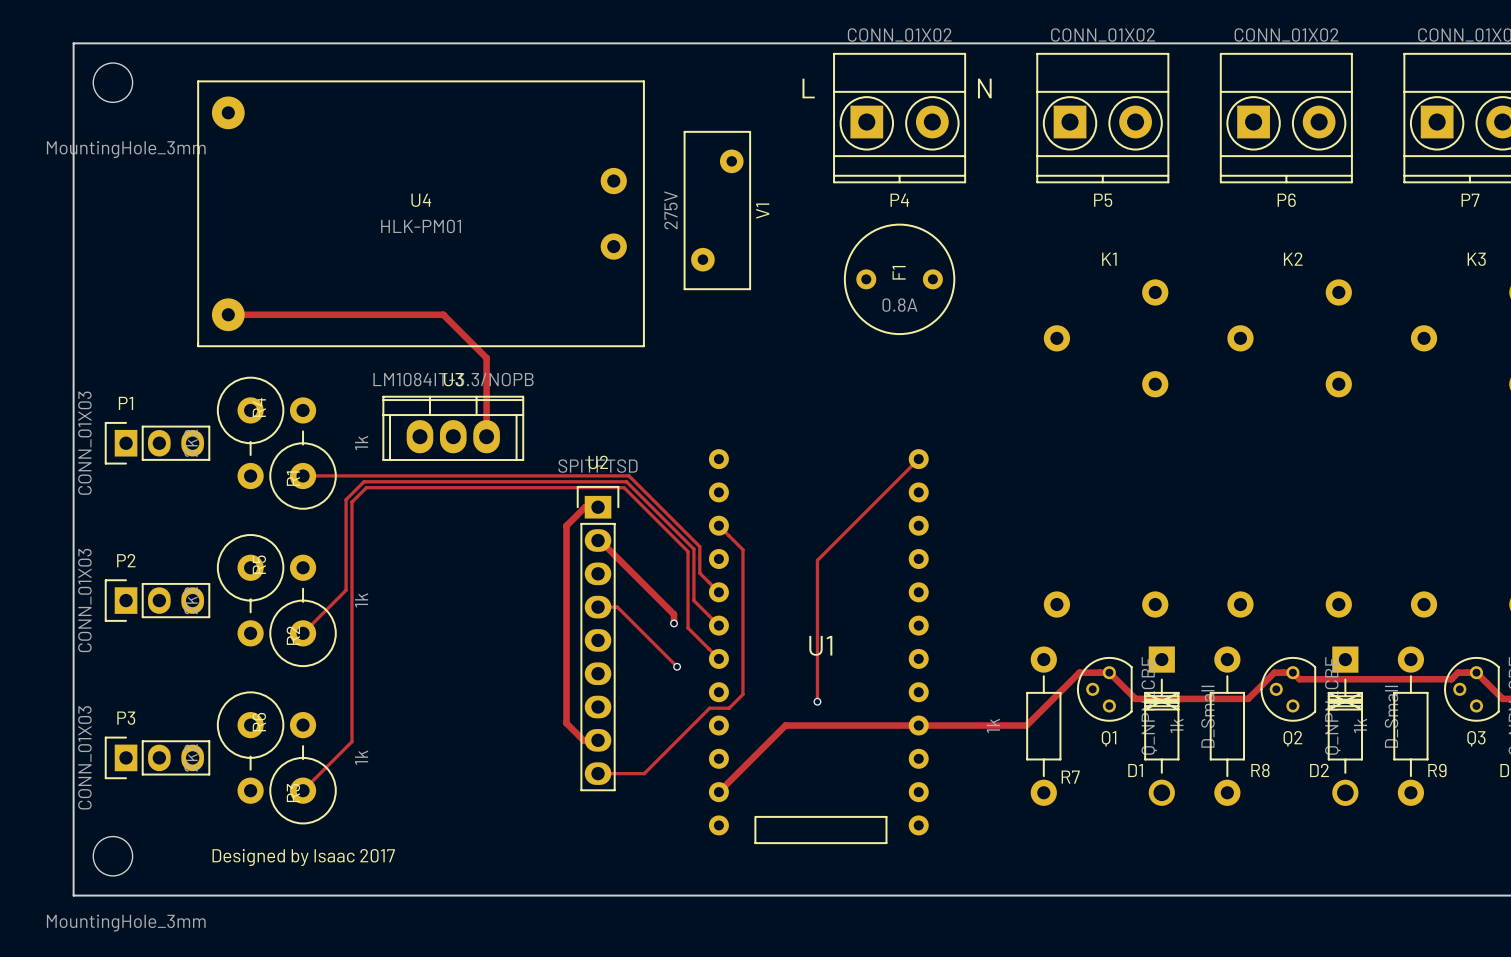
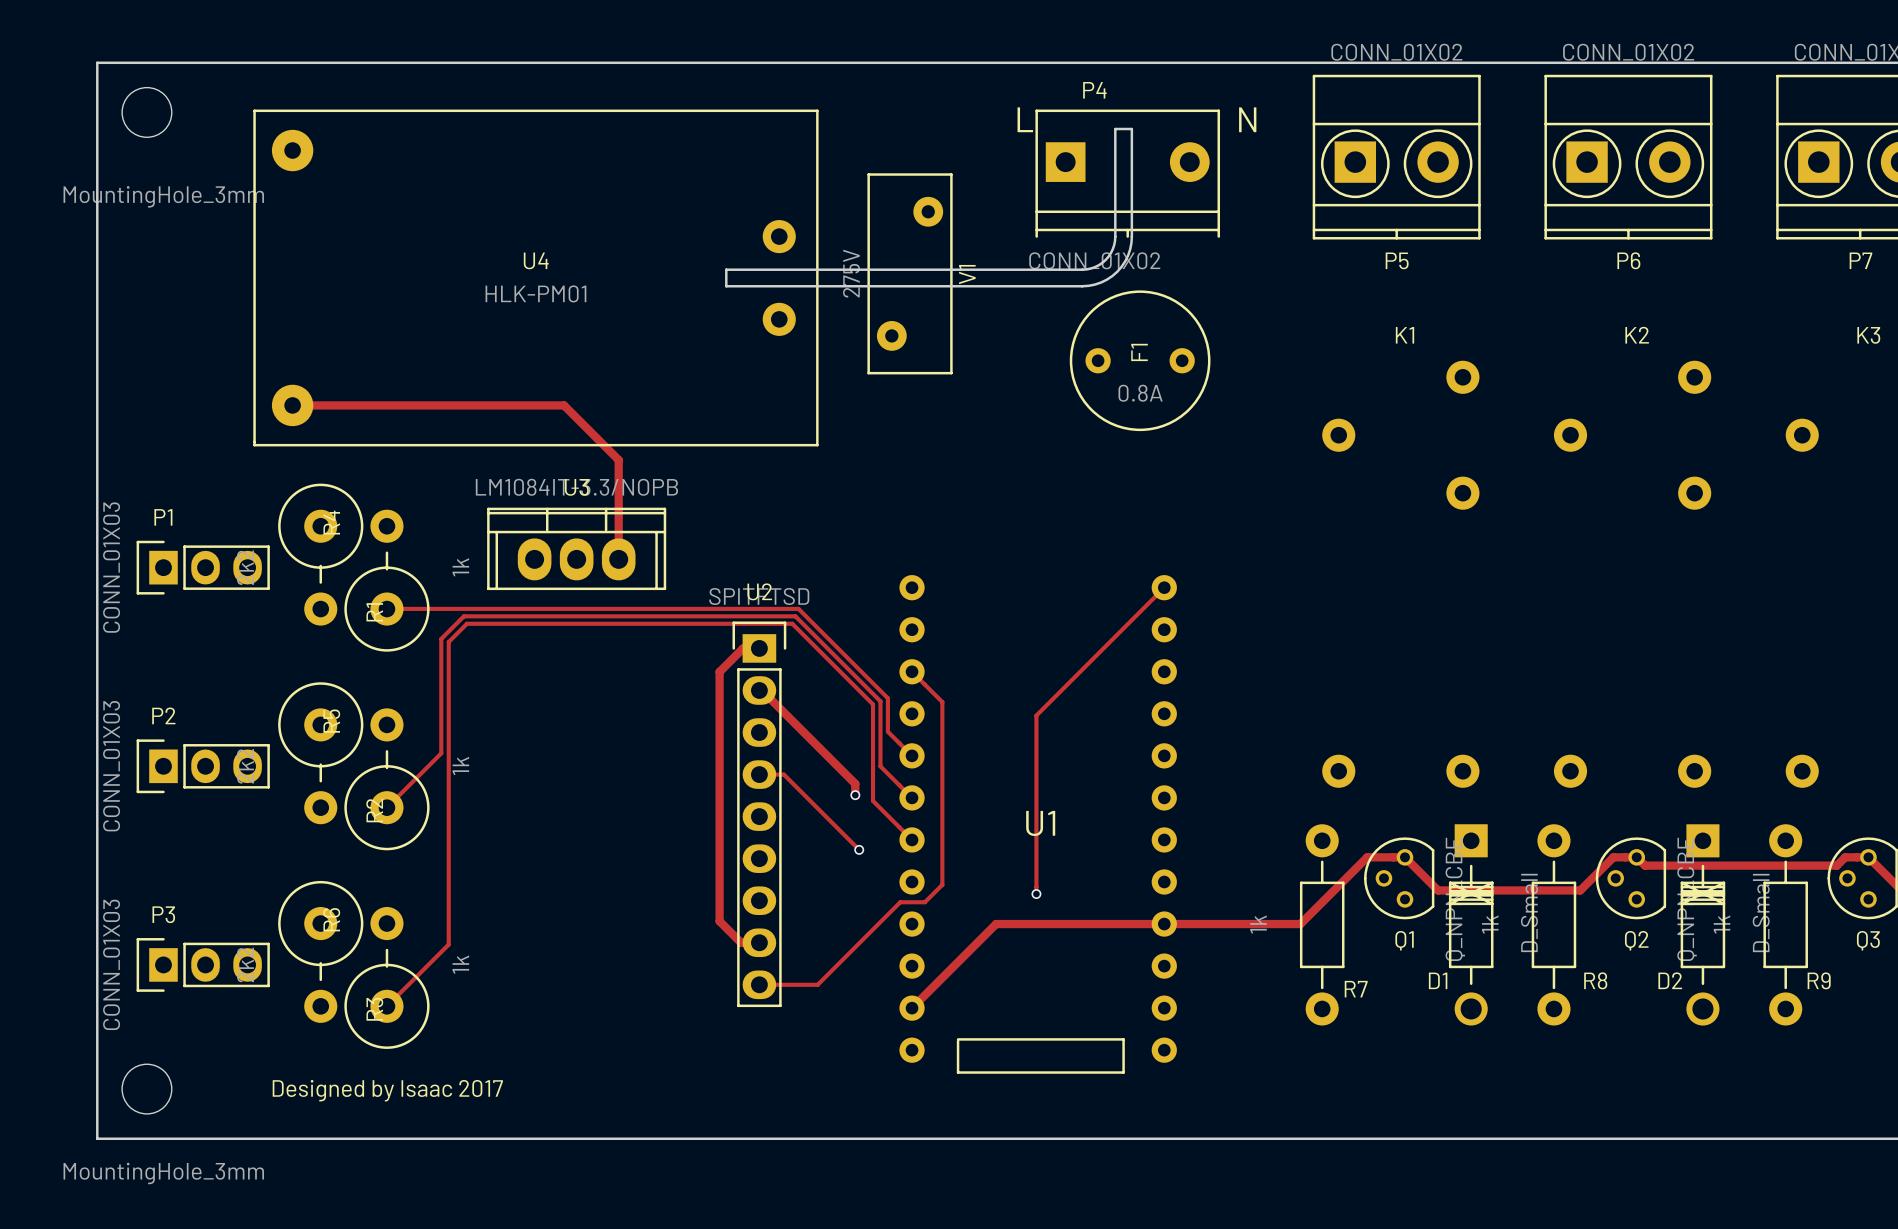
P4 value position: CONN_01X02 (899, 35) -> CONN_01X02 (1094, 260)
P4 footprint: [833, 52, 967, 184] -> [1035, 109, 1221, 238]
board edge: none -> (1115, 129) (1131, 129) (1131, 243) (1128, 255) (1121, 266) (1112, 275) (1101, 282) (1082, 286) (726, 286) (726, 269) (1082, 269) (1094, 267) (1108, 256) (1115, 240) (1115, 129)
P4 name position: P4 (899, 200) -> P4 (1094, 90)

